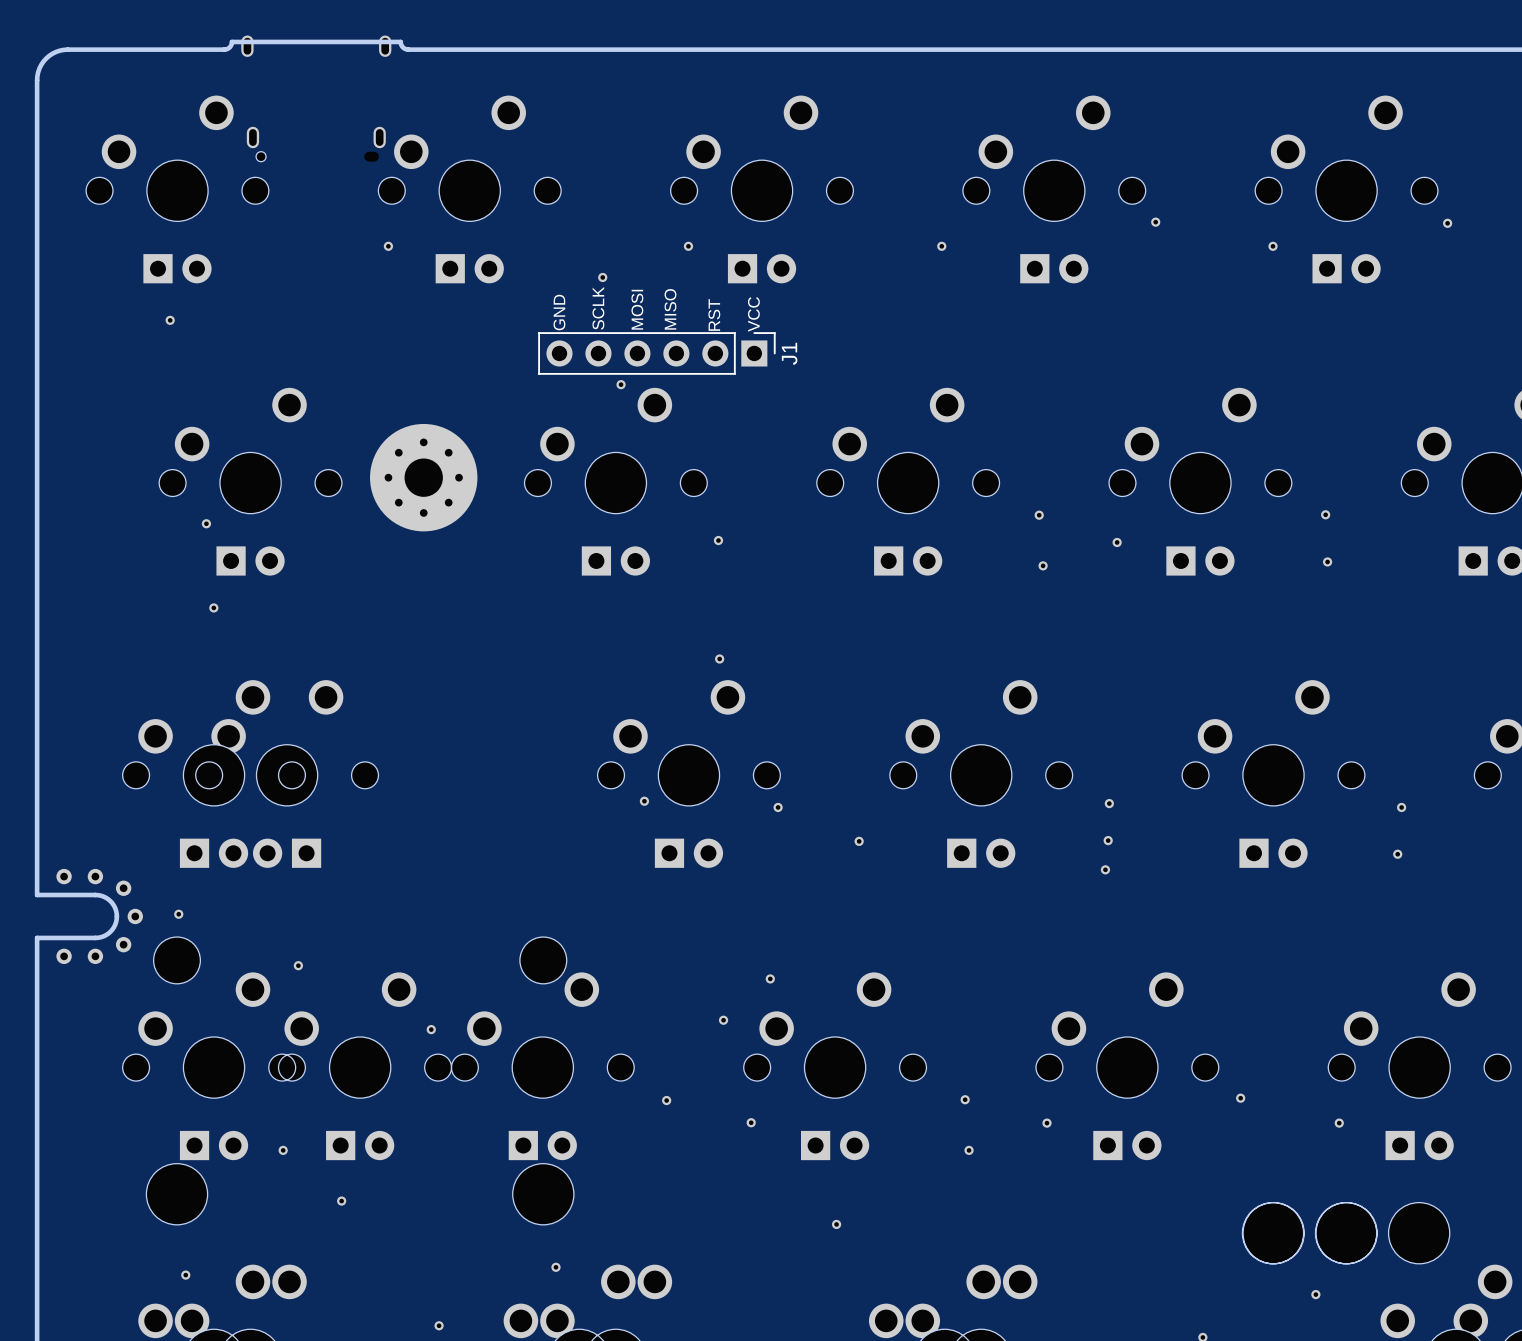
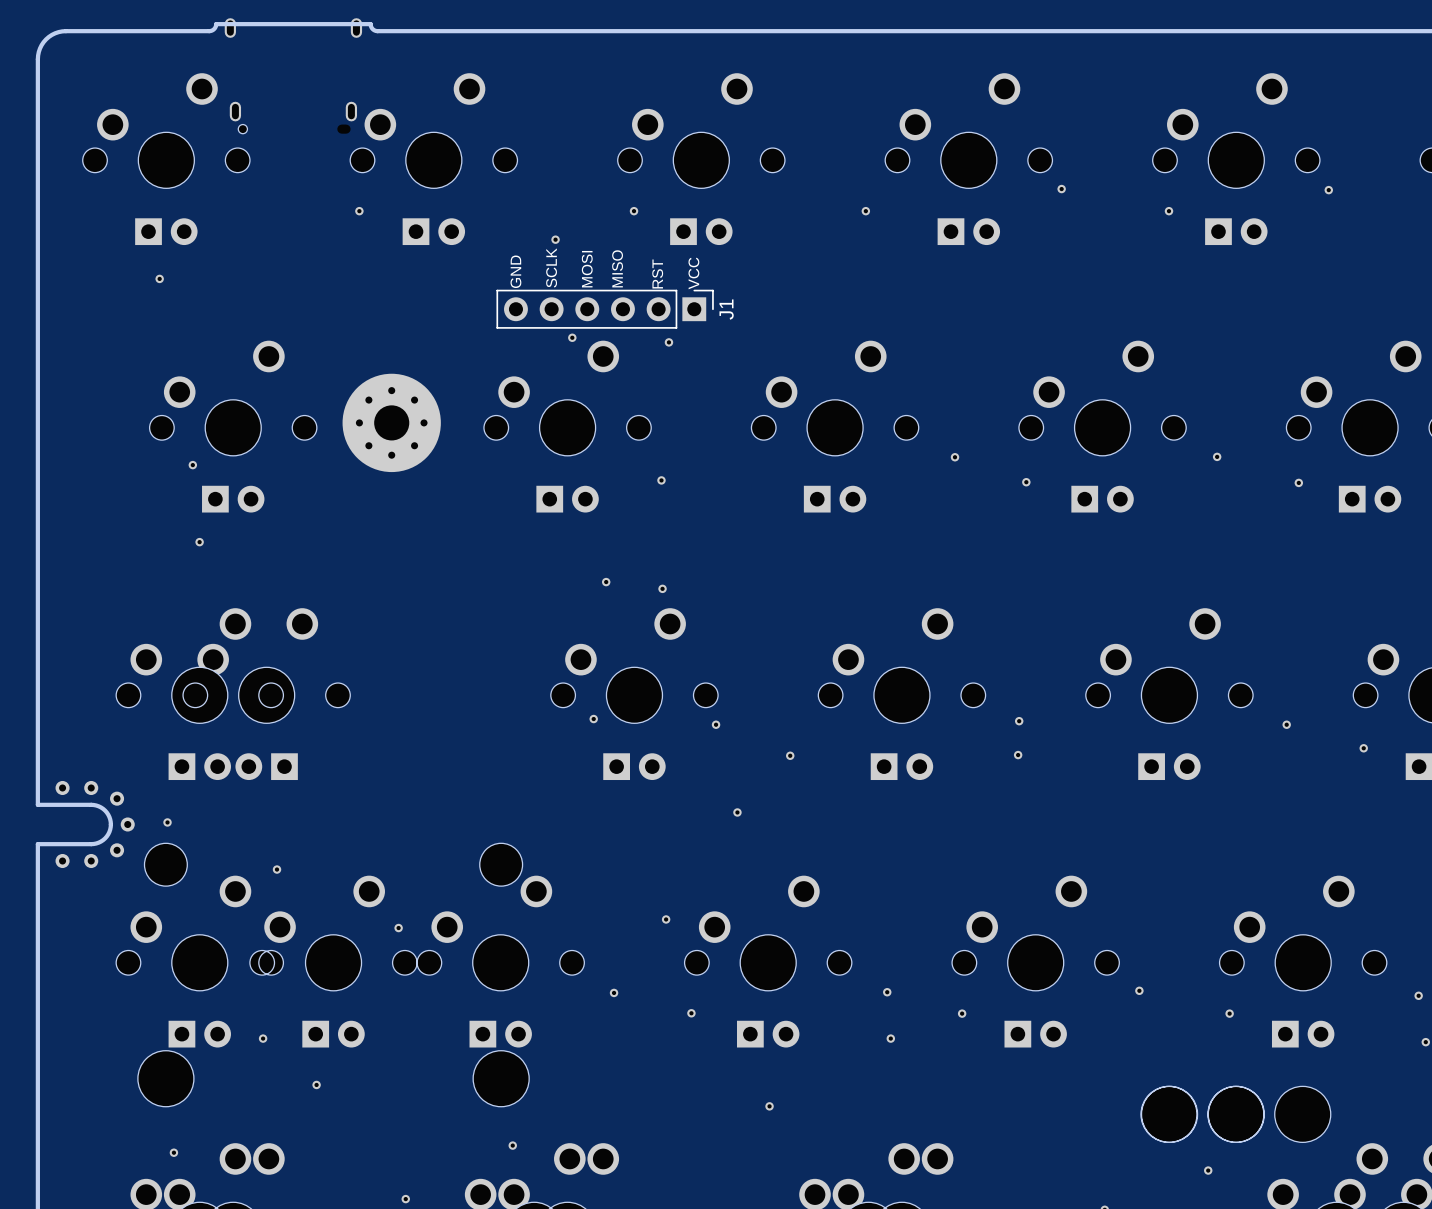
part: none -> (668, 342)
part position: (1327, 561) -> (1298, 482)
part: (1043, 565) -> none
part: none -> (606, 582)
part position: (1397, 854) -> (1363, 748)
part: (1105, 869) -> none
part position: (770, 978) -> (737, 812)

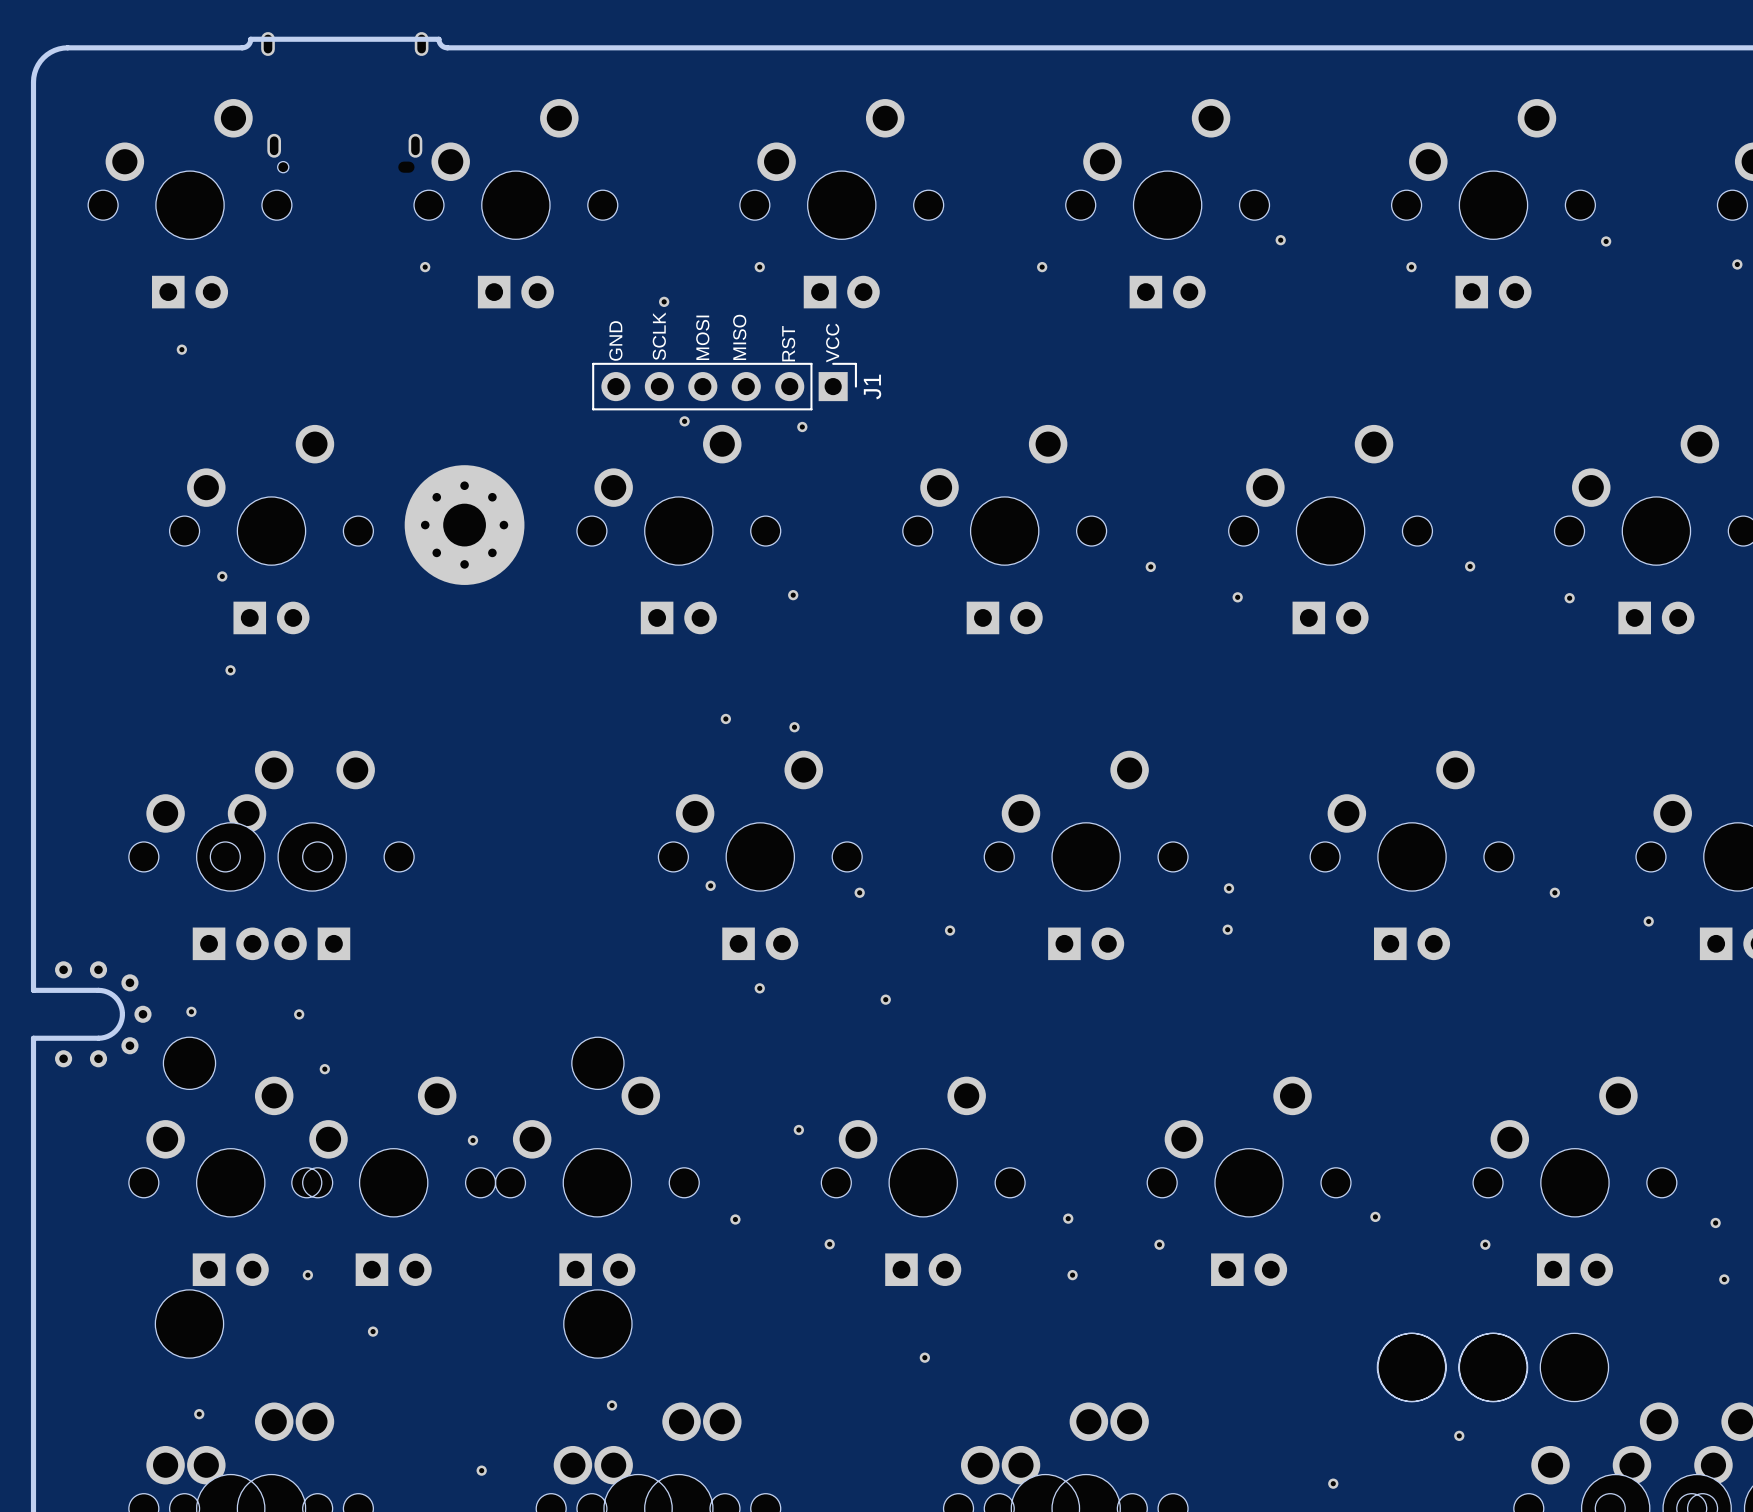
part: none -> (759, 988)
part: none -> (299, 1014)

